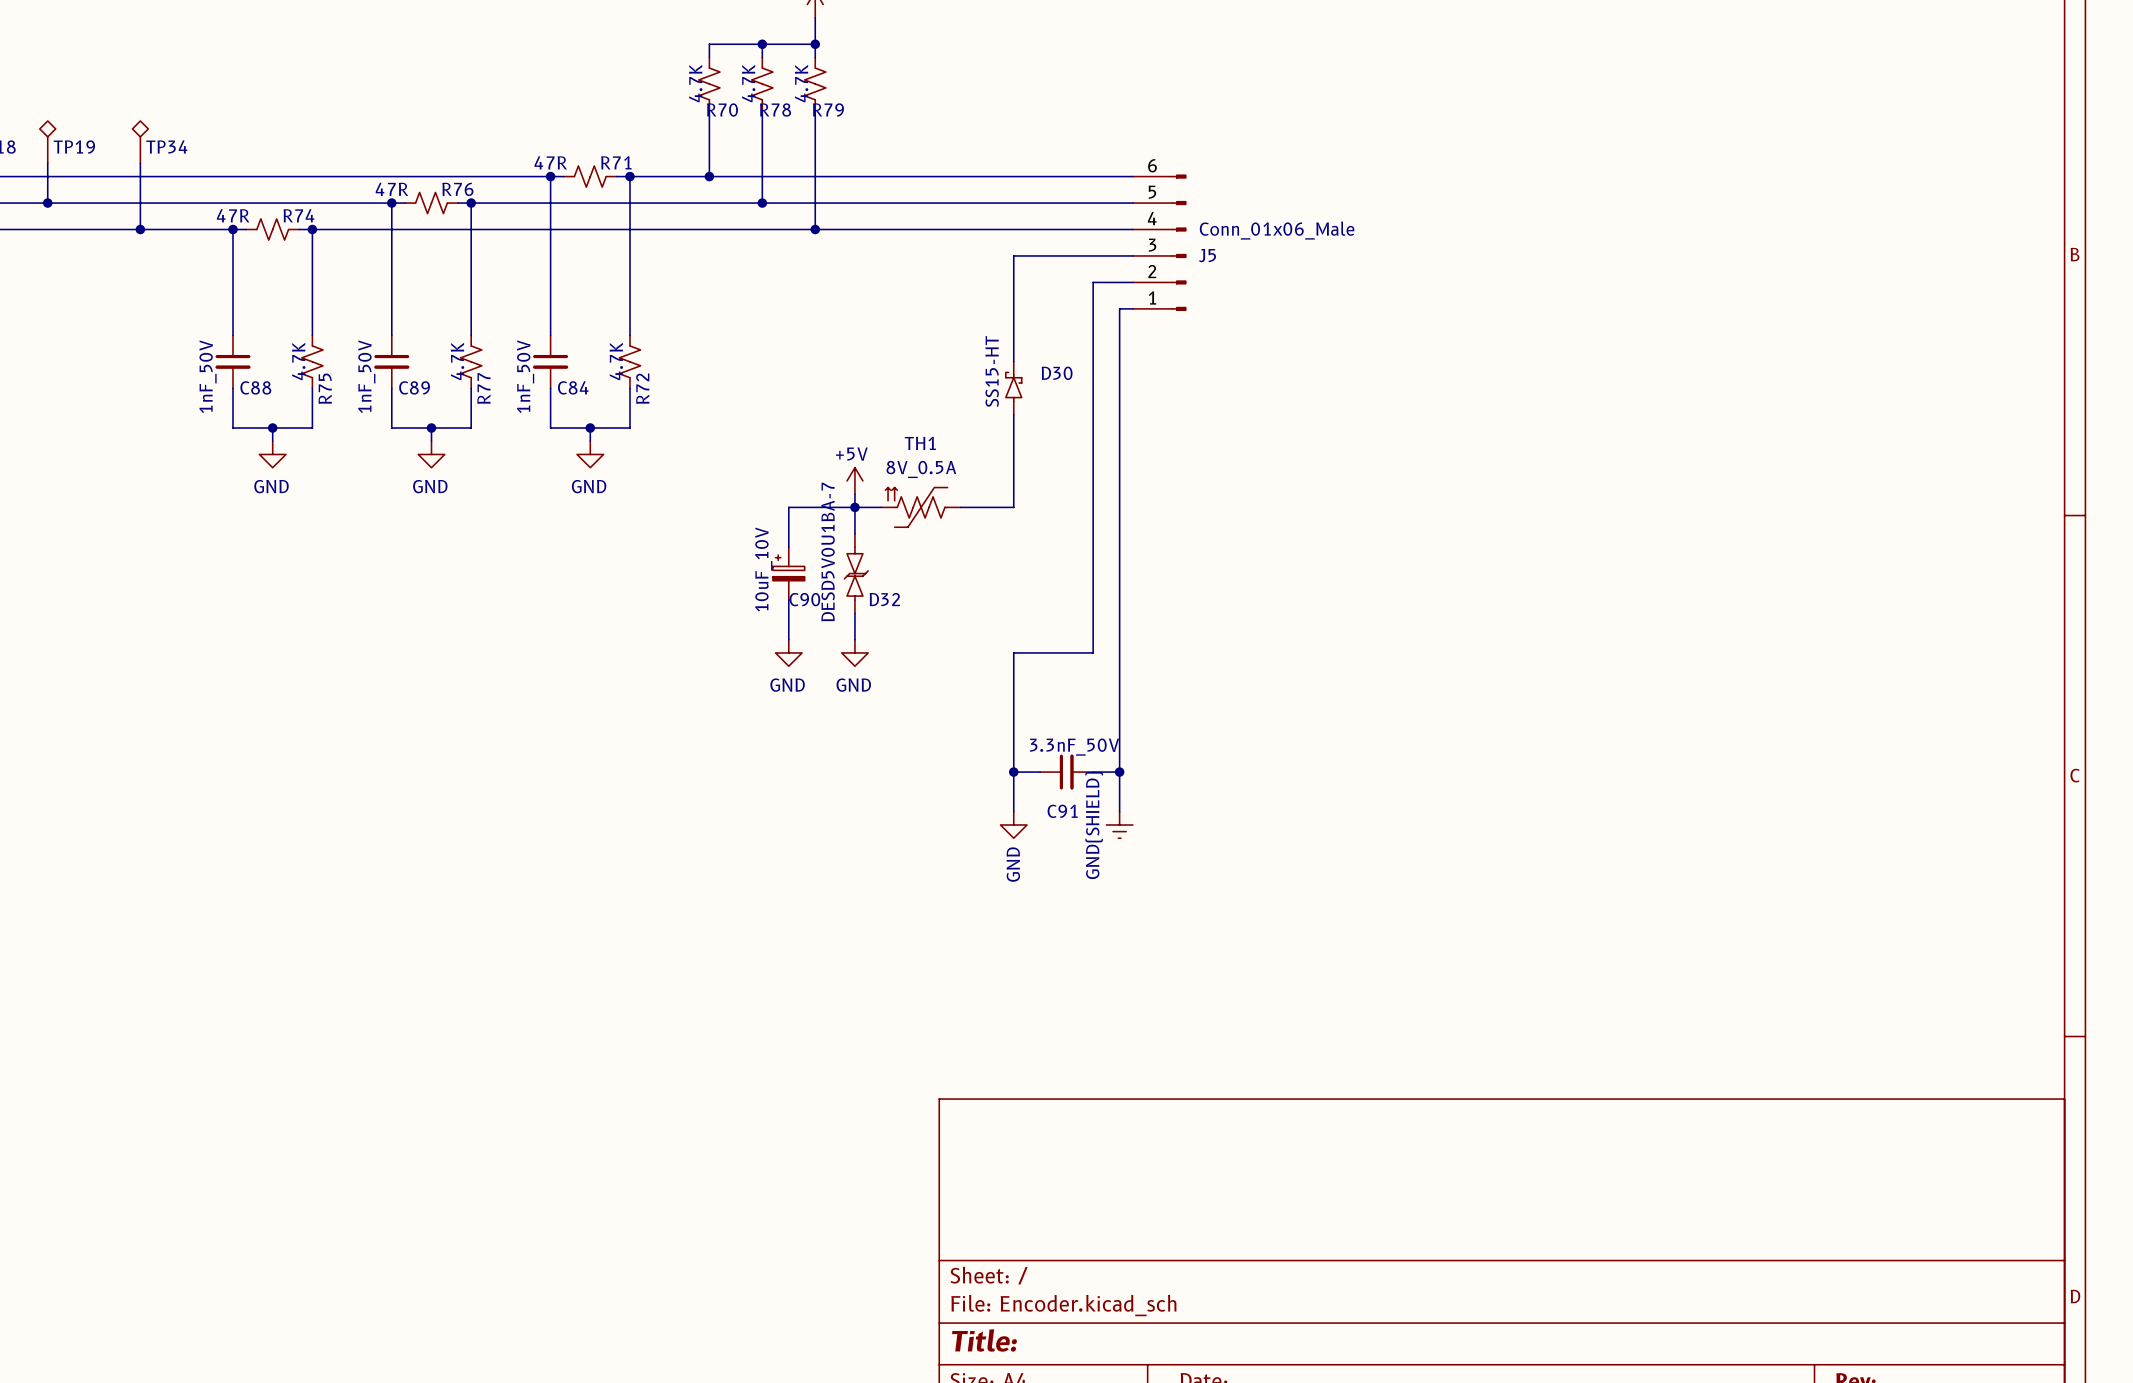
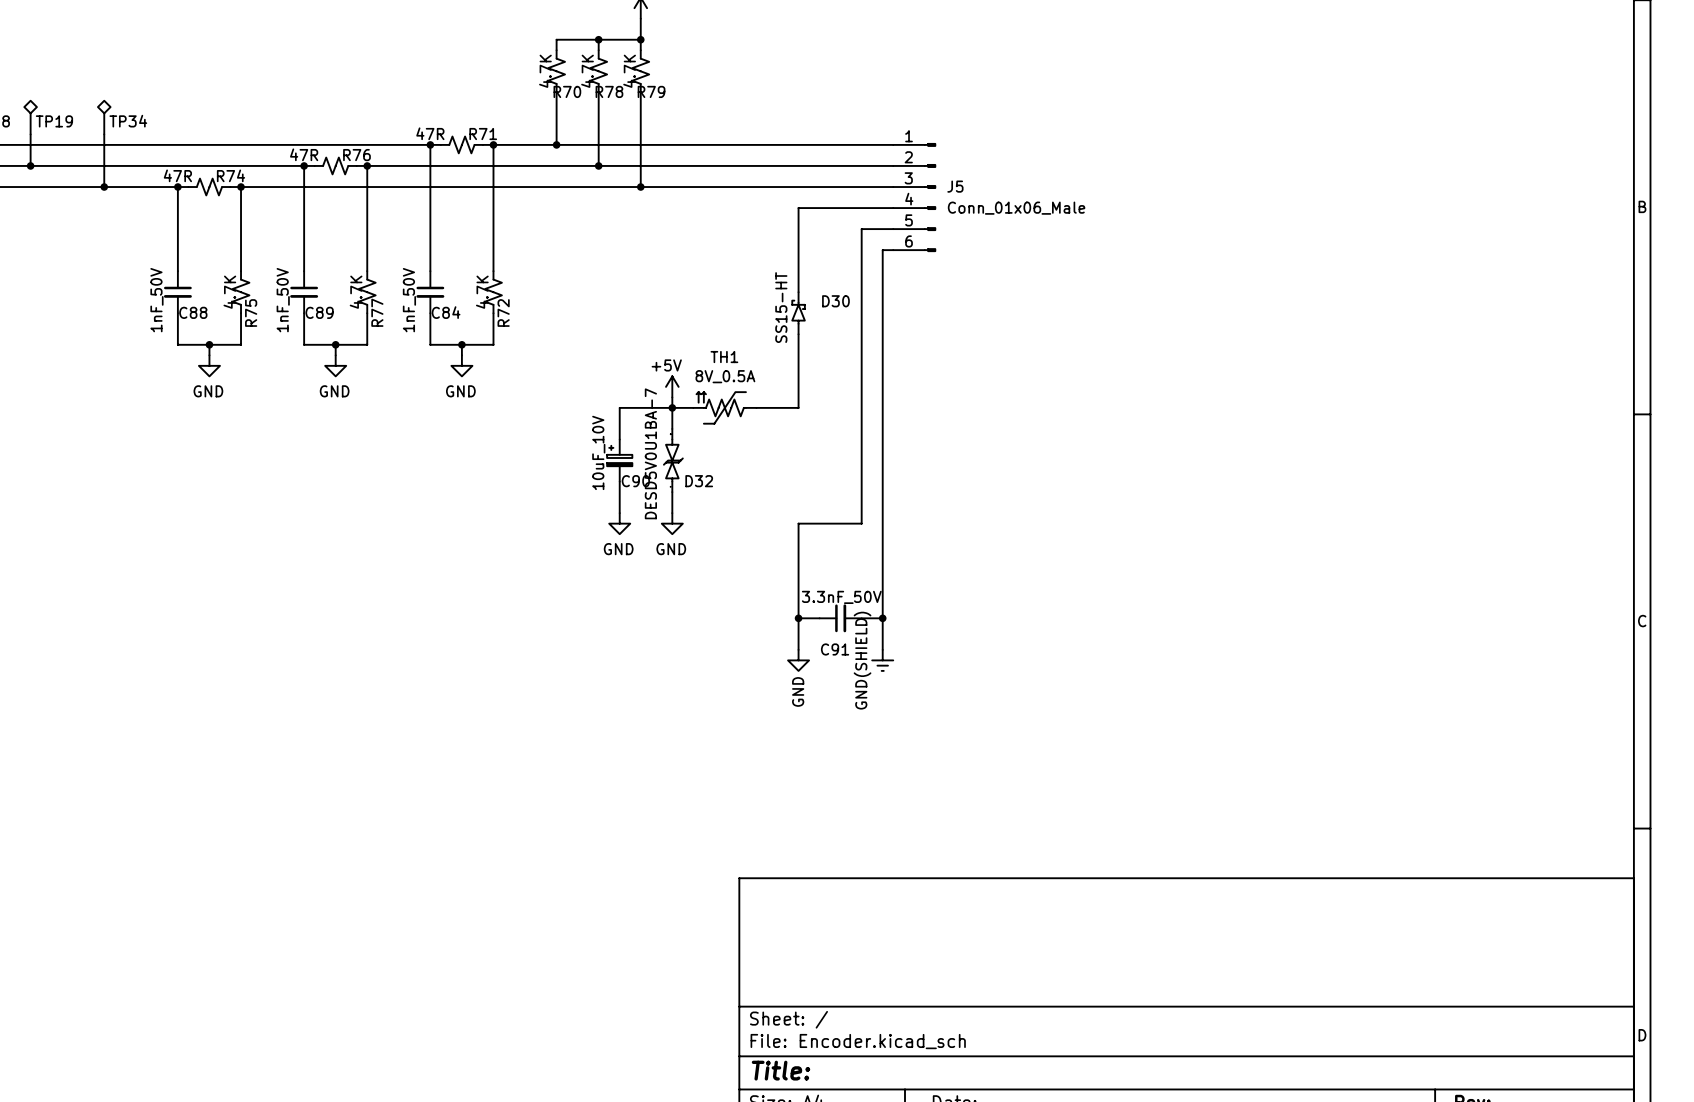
J5 flip: as is (1179, 242) -> up-down (930, 197)

